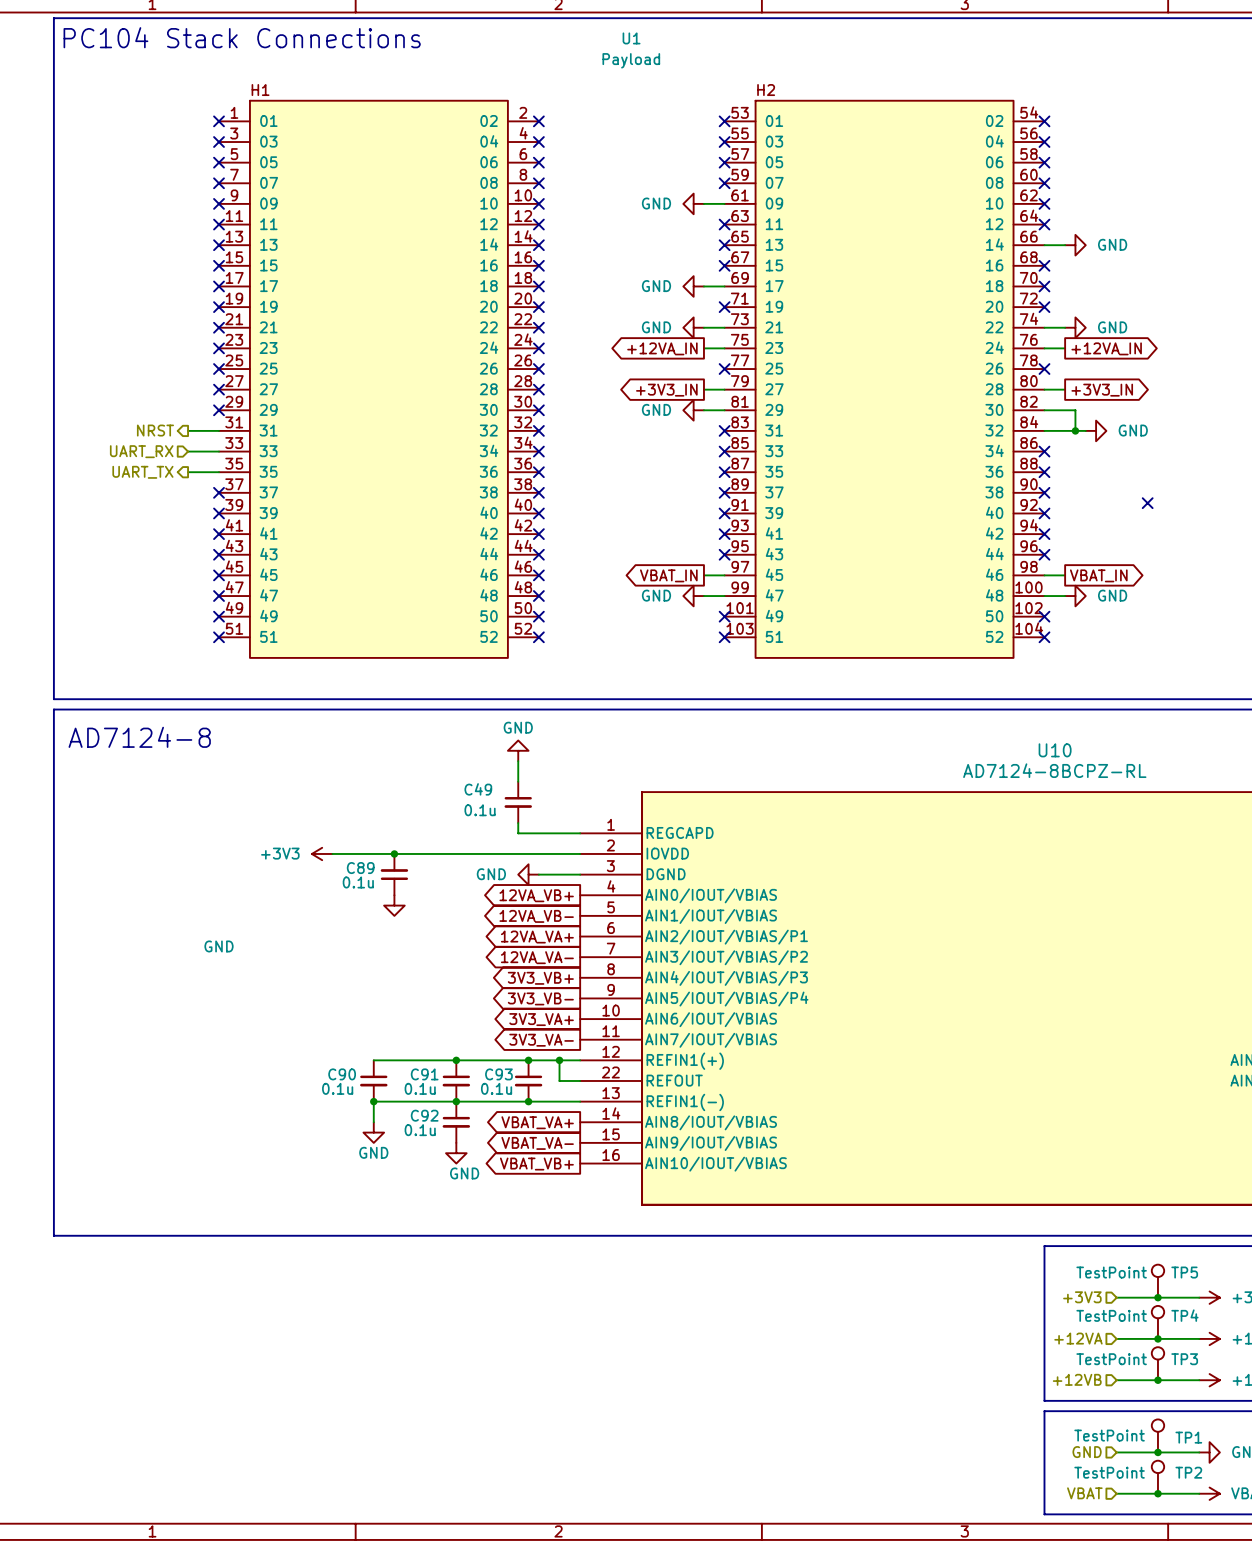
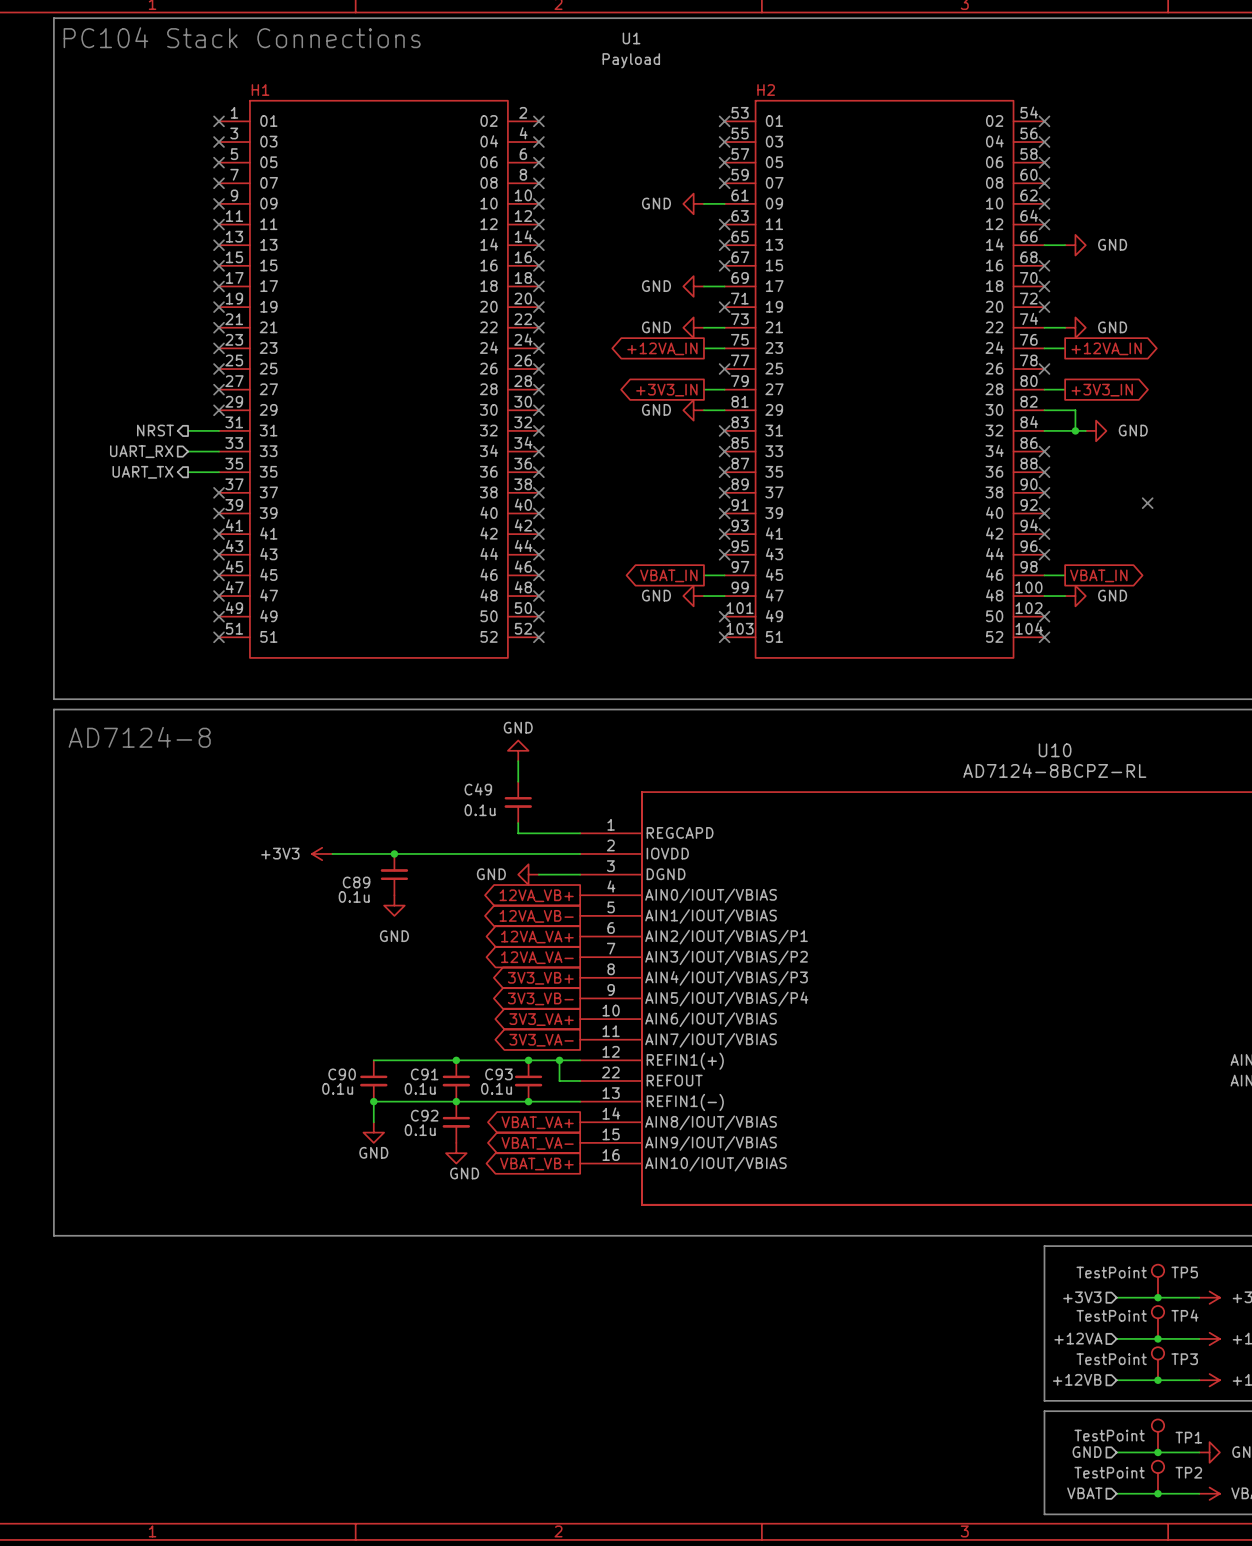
C89 name position: C89 (360, 868) -> C89 (356, 882)
C89 value position: 0.1u (358, 882) -> 0.1u (354, 896)
power symbol text position: GND (219, 946) -> GND (394, 936)

